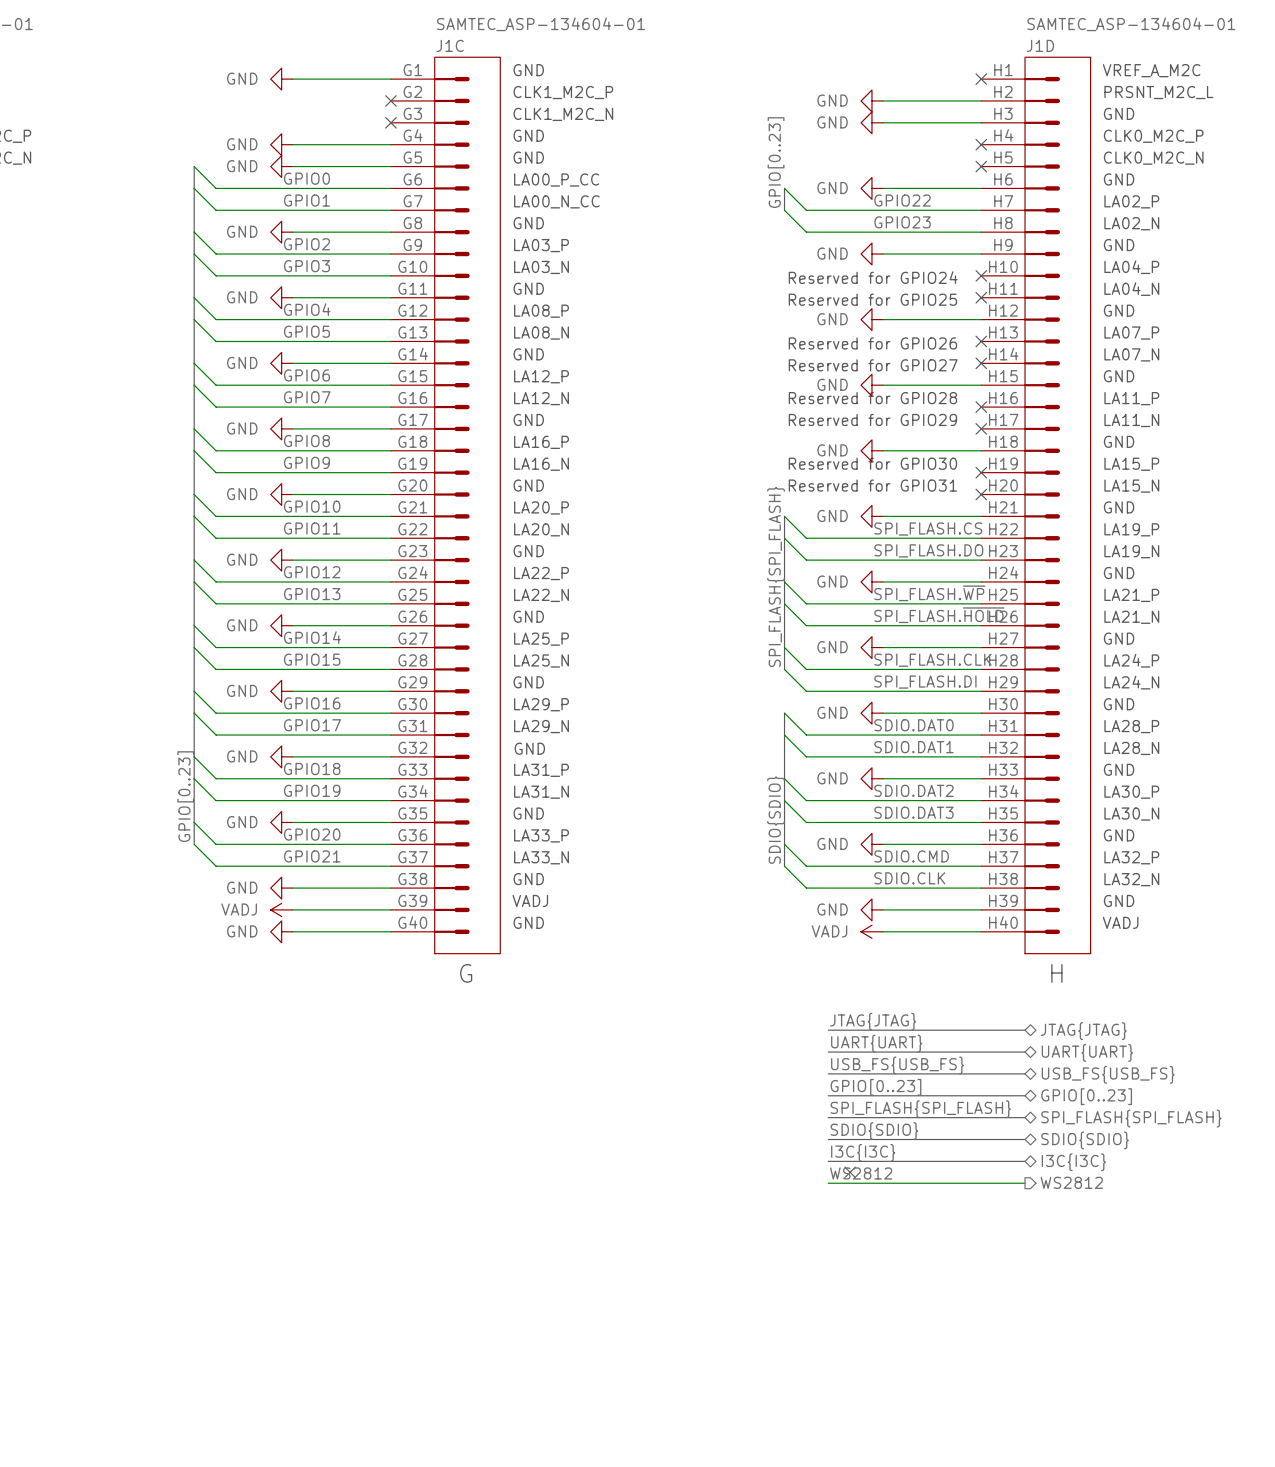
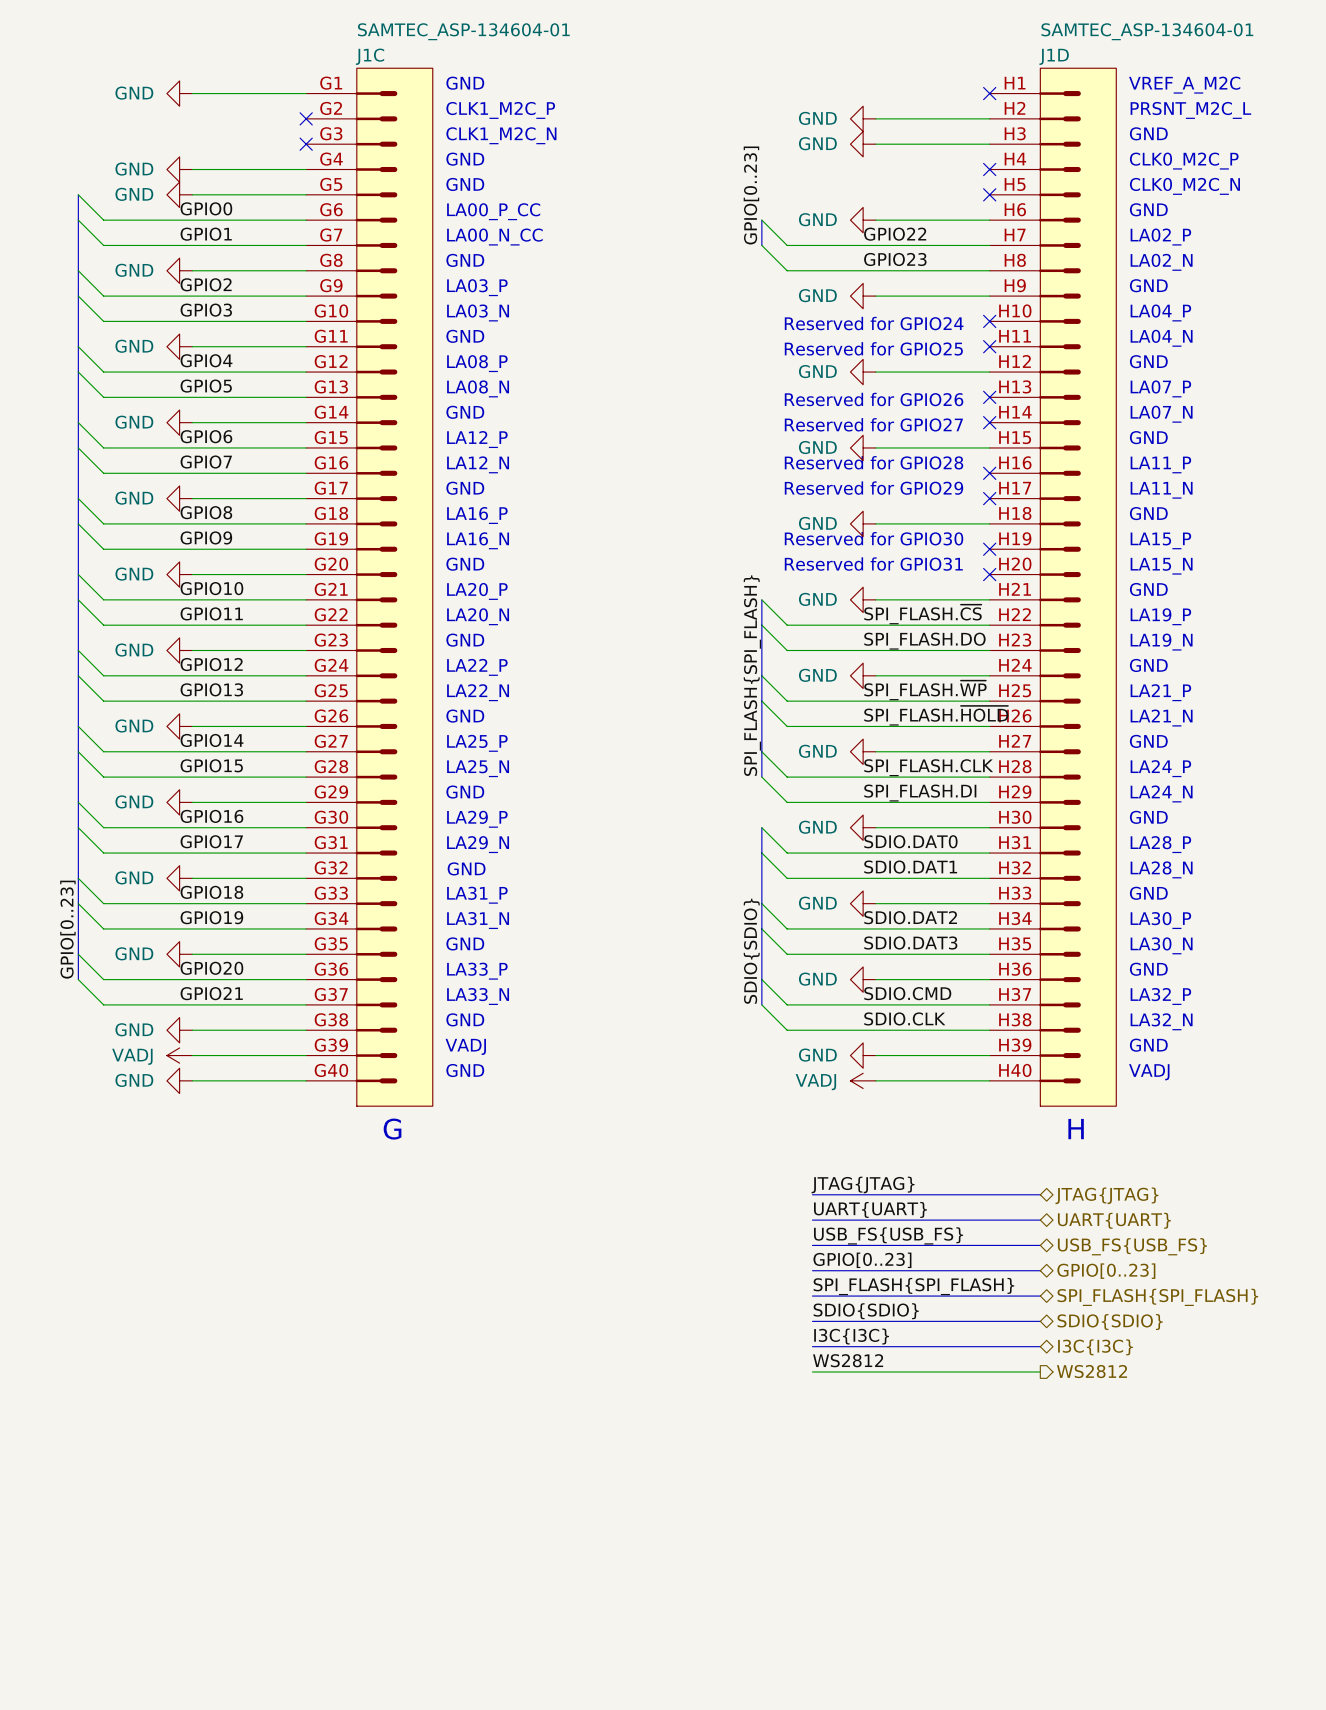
label: SPI_FLASH.CS (928, 529) -> SPI_FLASH.~{CS} (923, 614)
no-connect mark: (850, 1172) -> none

